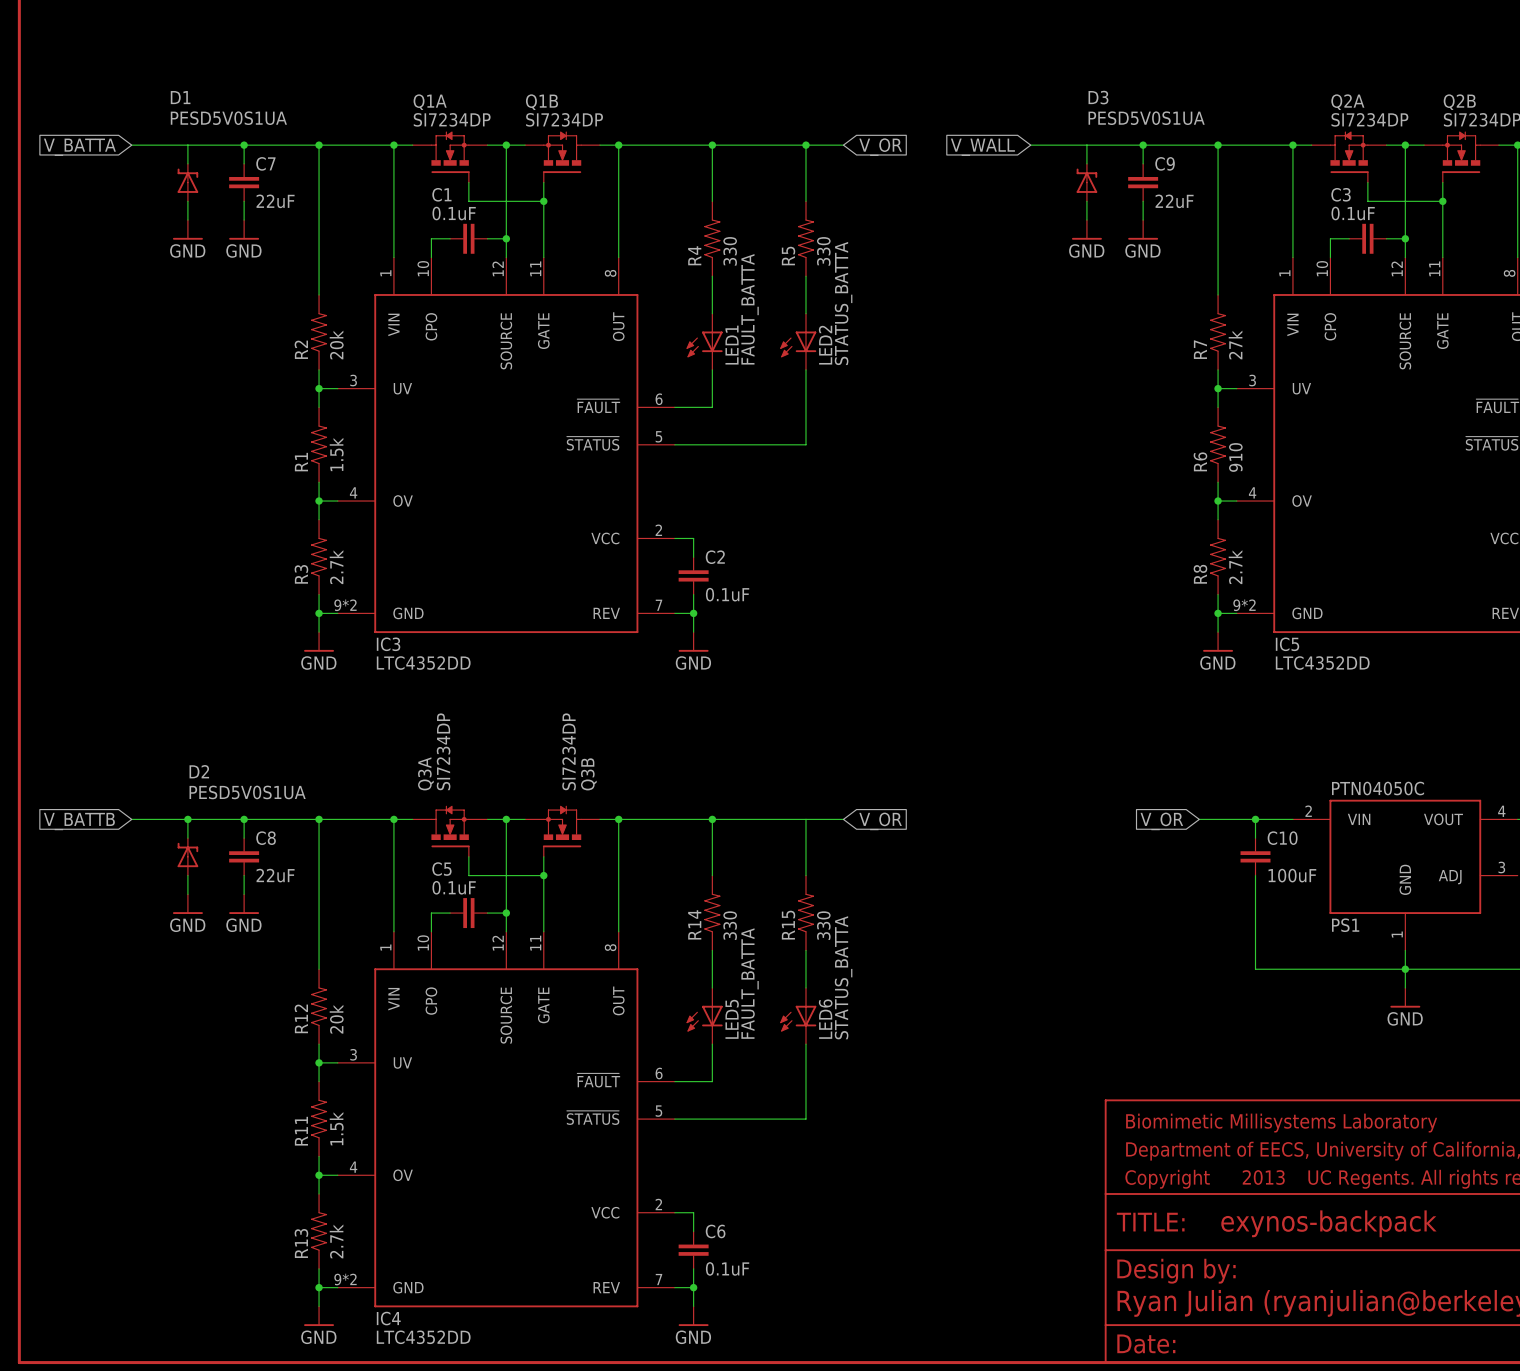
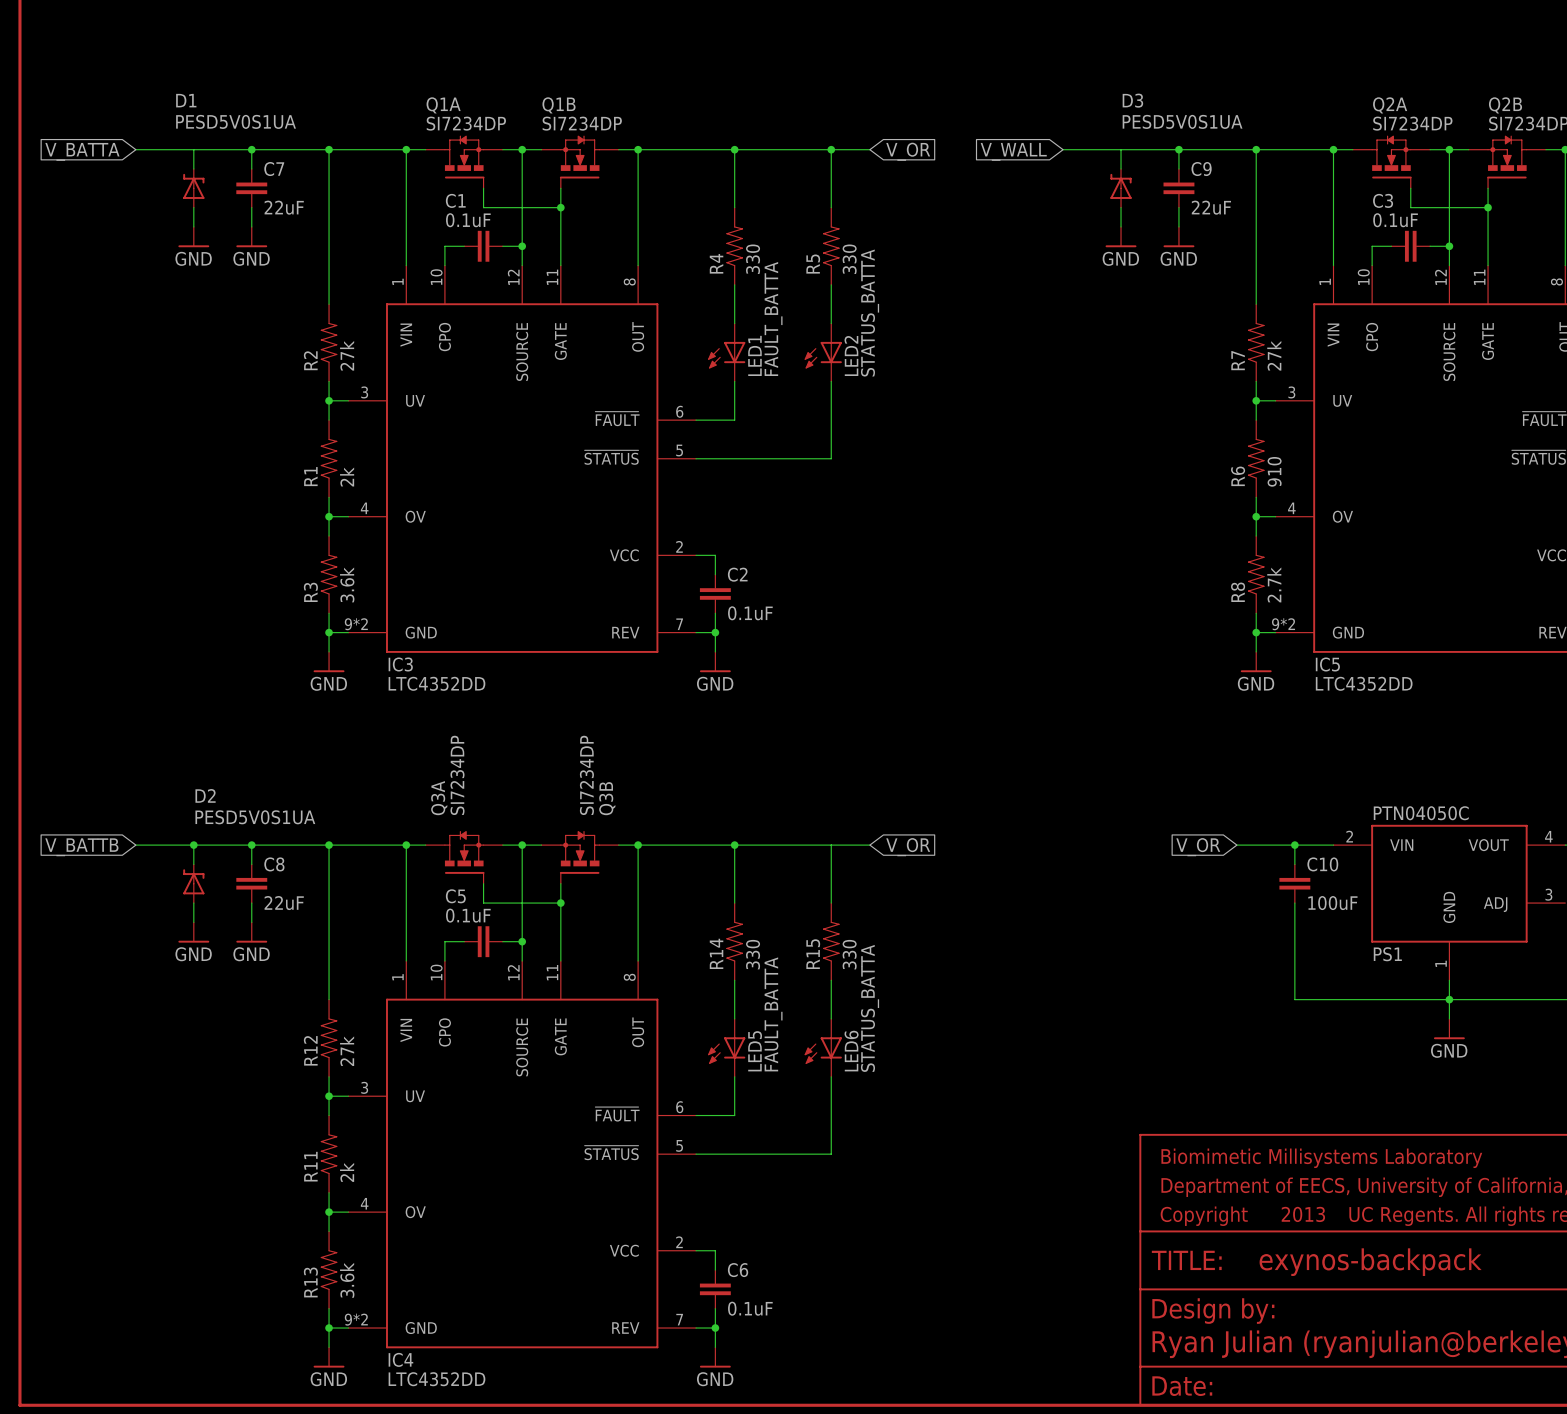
R2 value: 20k (336, 344) -> 27k (347, 355)
R1 value: 1.5k (336, 454) -> 2k (347, 477)
R3 value: 2.7k (336, 567) -> 3.6k (347, 584)
R12 value: 20k (336, 1019) -> 27k (347, 1051)
R11 value: 1.5k (336, 1128) -> 2k (347, 1172)
R13 value: 2.7k (336, 1241) -> 3.6k (347, 1280)

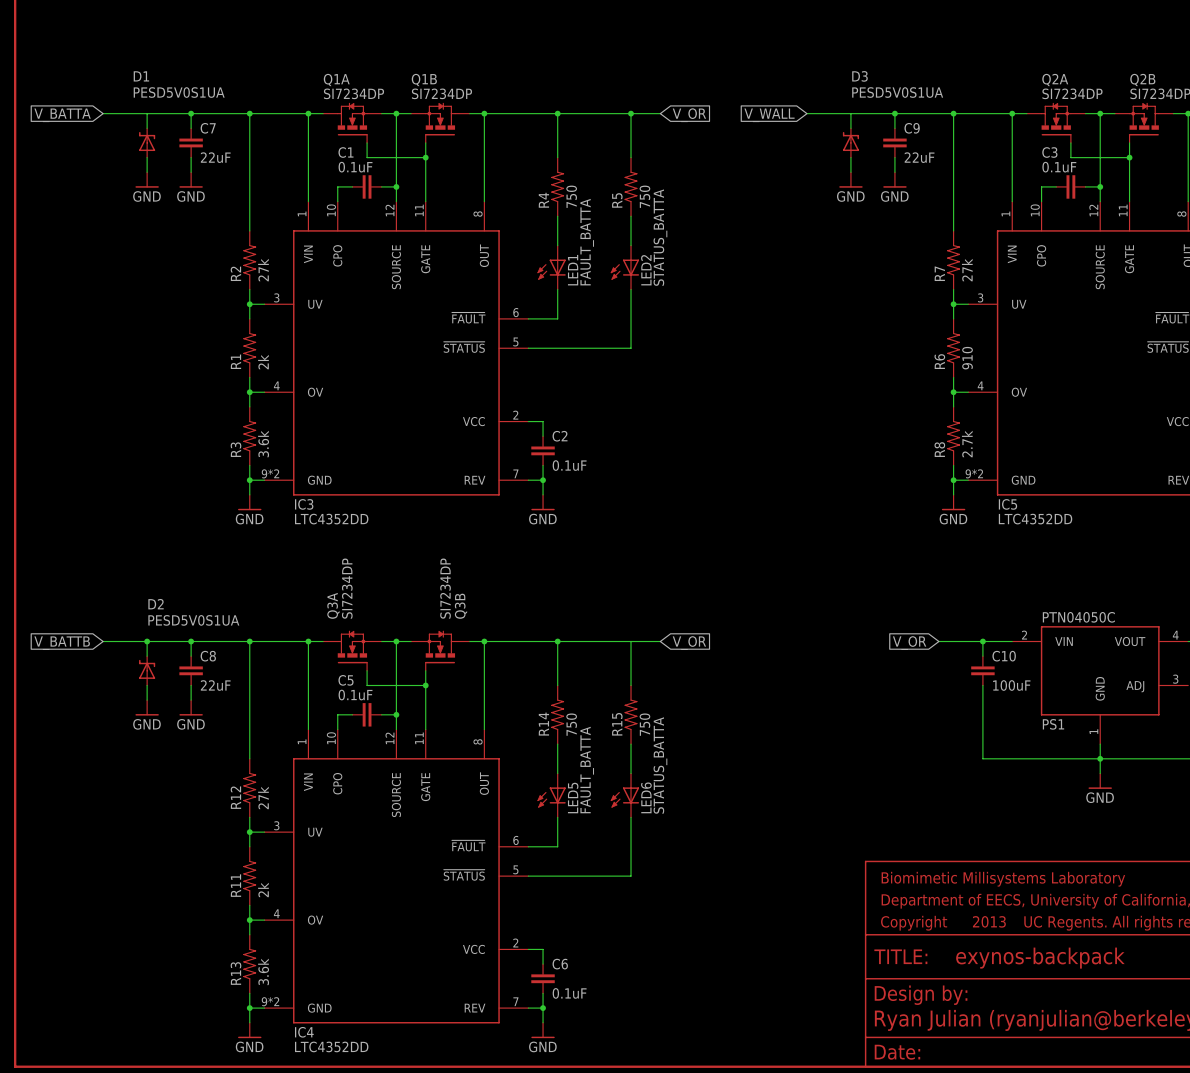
R4 value: 330 (753, 259) -> 750 (571, 196)
R5 value: 330 (849, 259) -> 750 (644, 196)
R14 value: 330 (753, 954) -> 750 (571, 724)
R15 value: 330 (849, 954) -> 750 (644, 724)

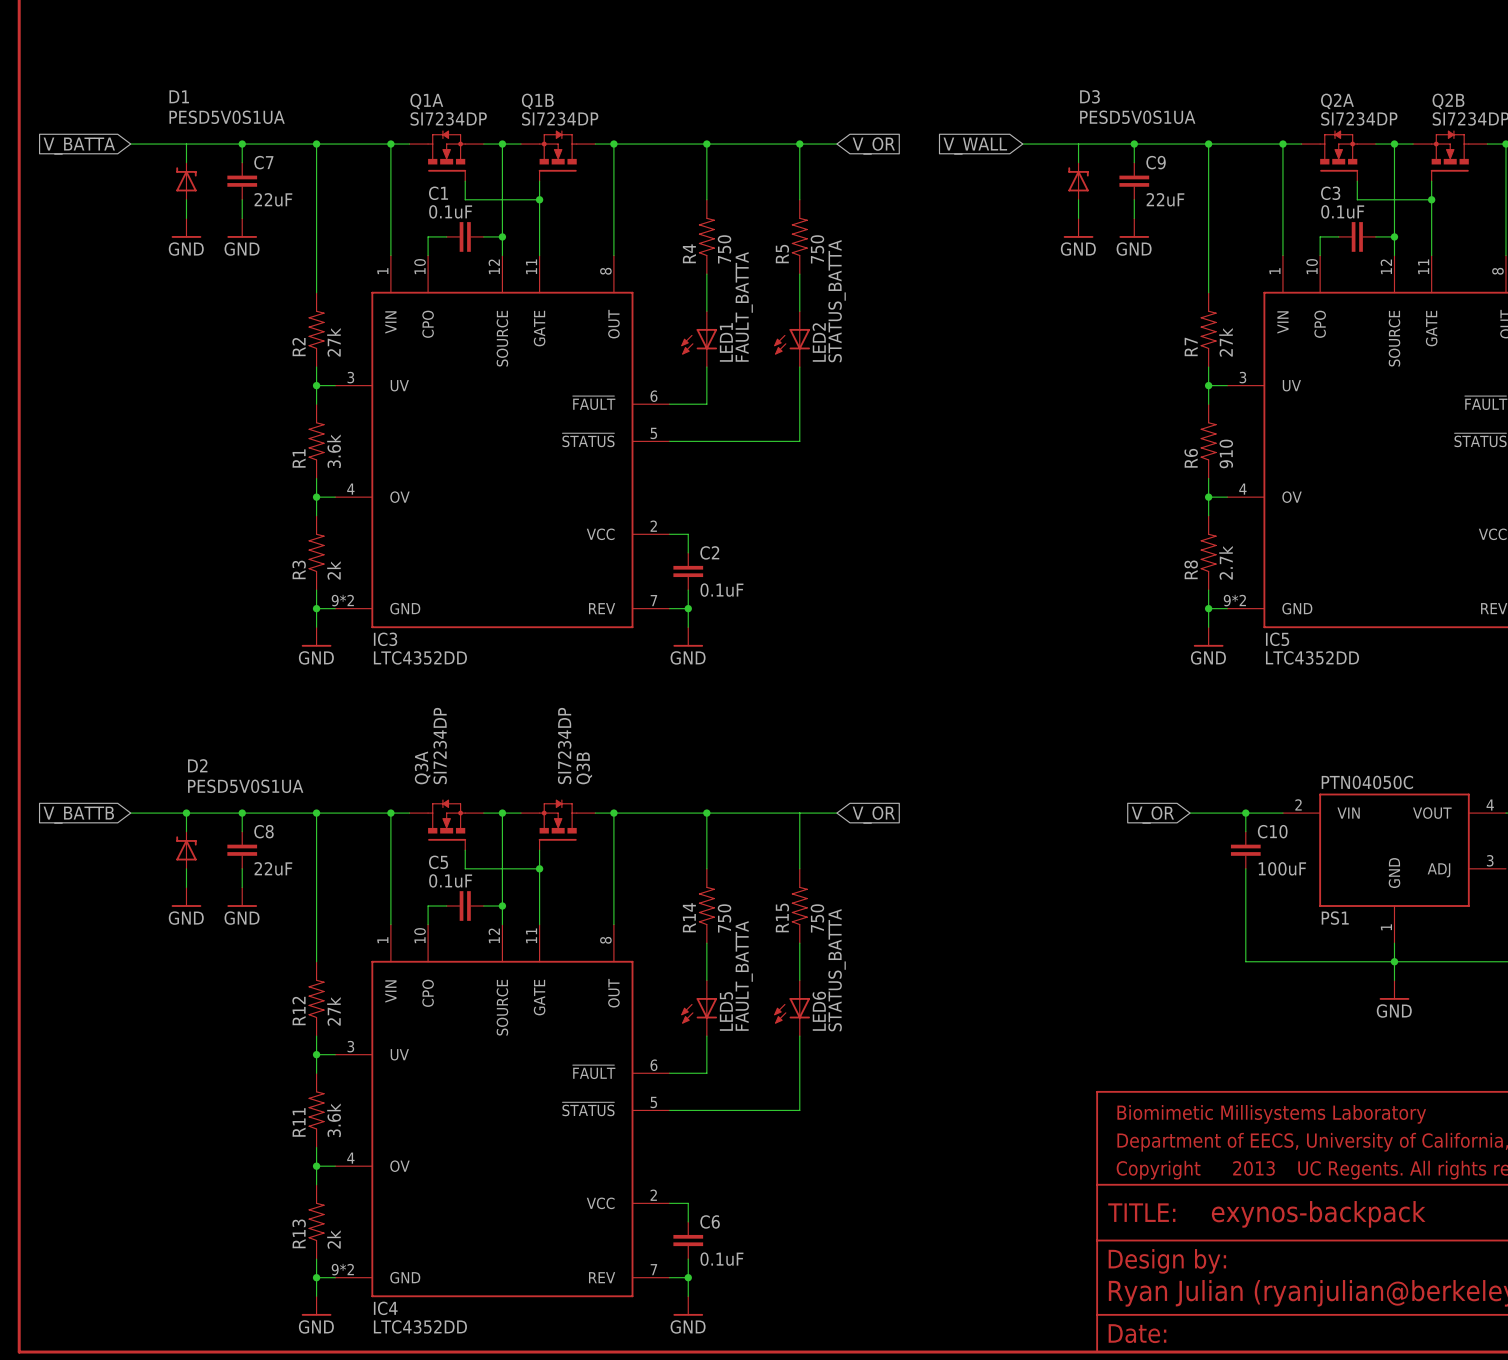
R1 value: 2k (263, 362) -> 3.6k (334, 451)
R3 value: 3.6k (263, 444) -> 2k (333, 570)
R11 value: 2k (263, 889) -> 3.6k (334, 1120)
R13 value: 3.6k (263, 971) -> 2k (333, 1239)

